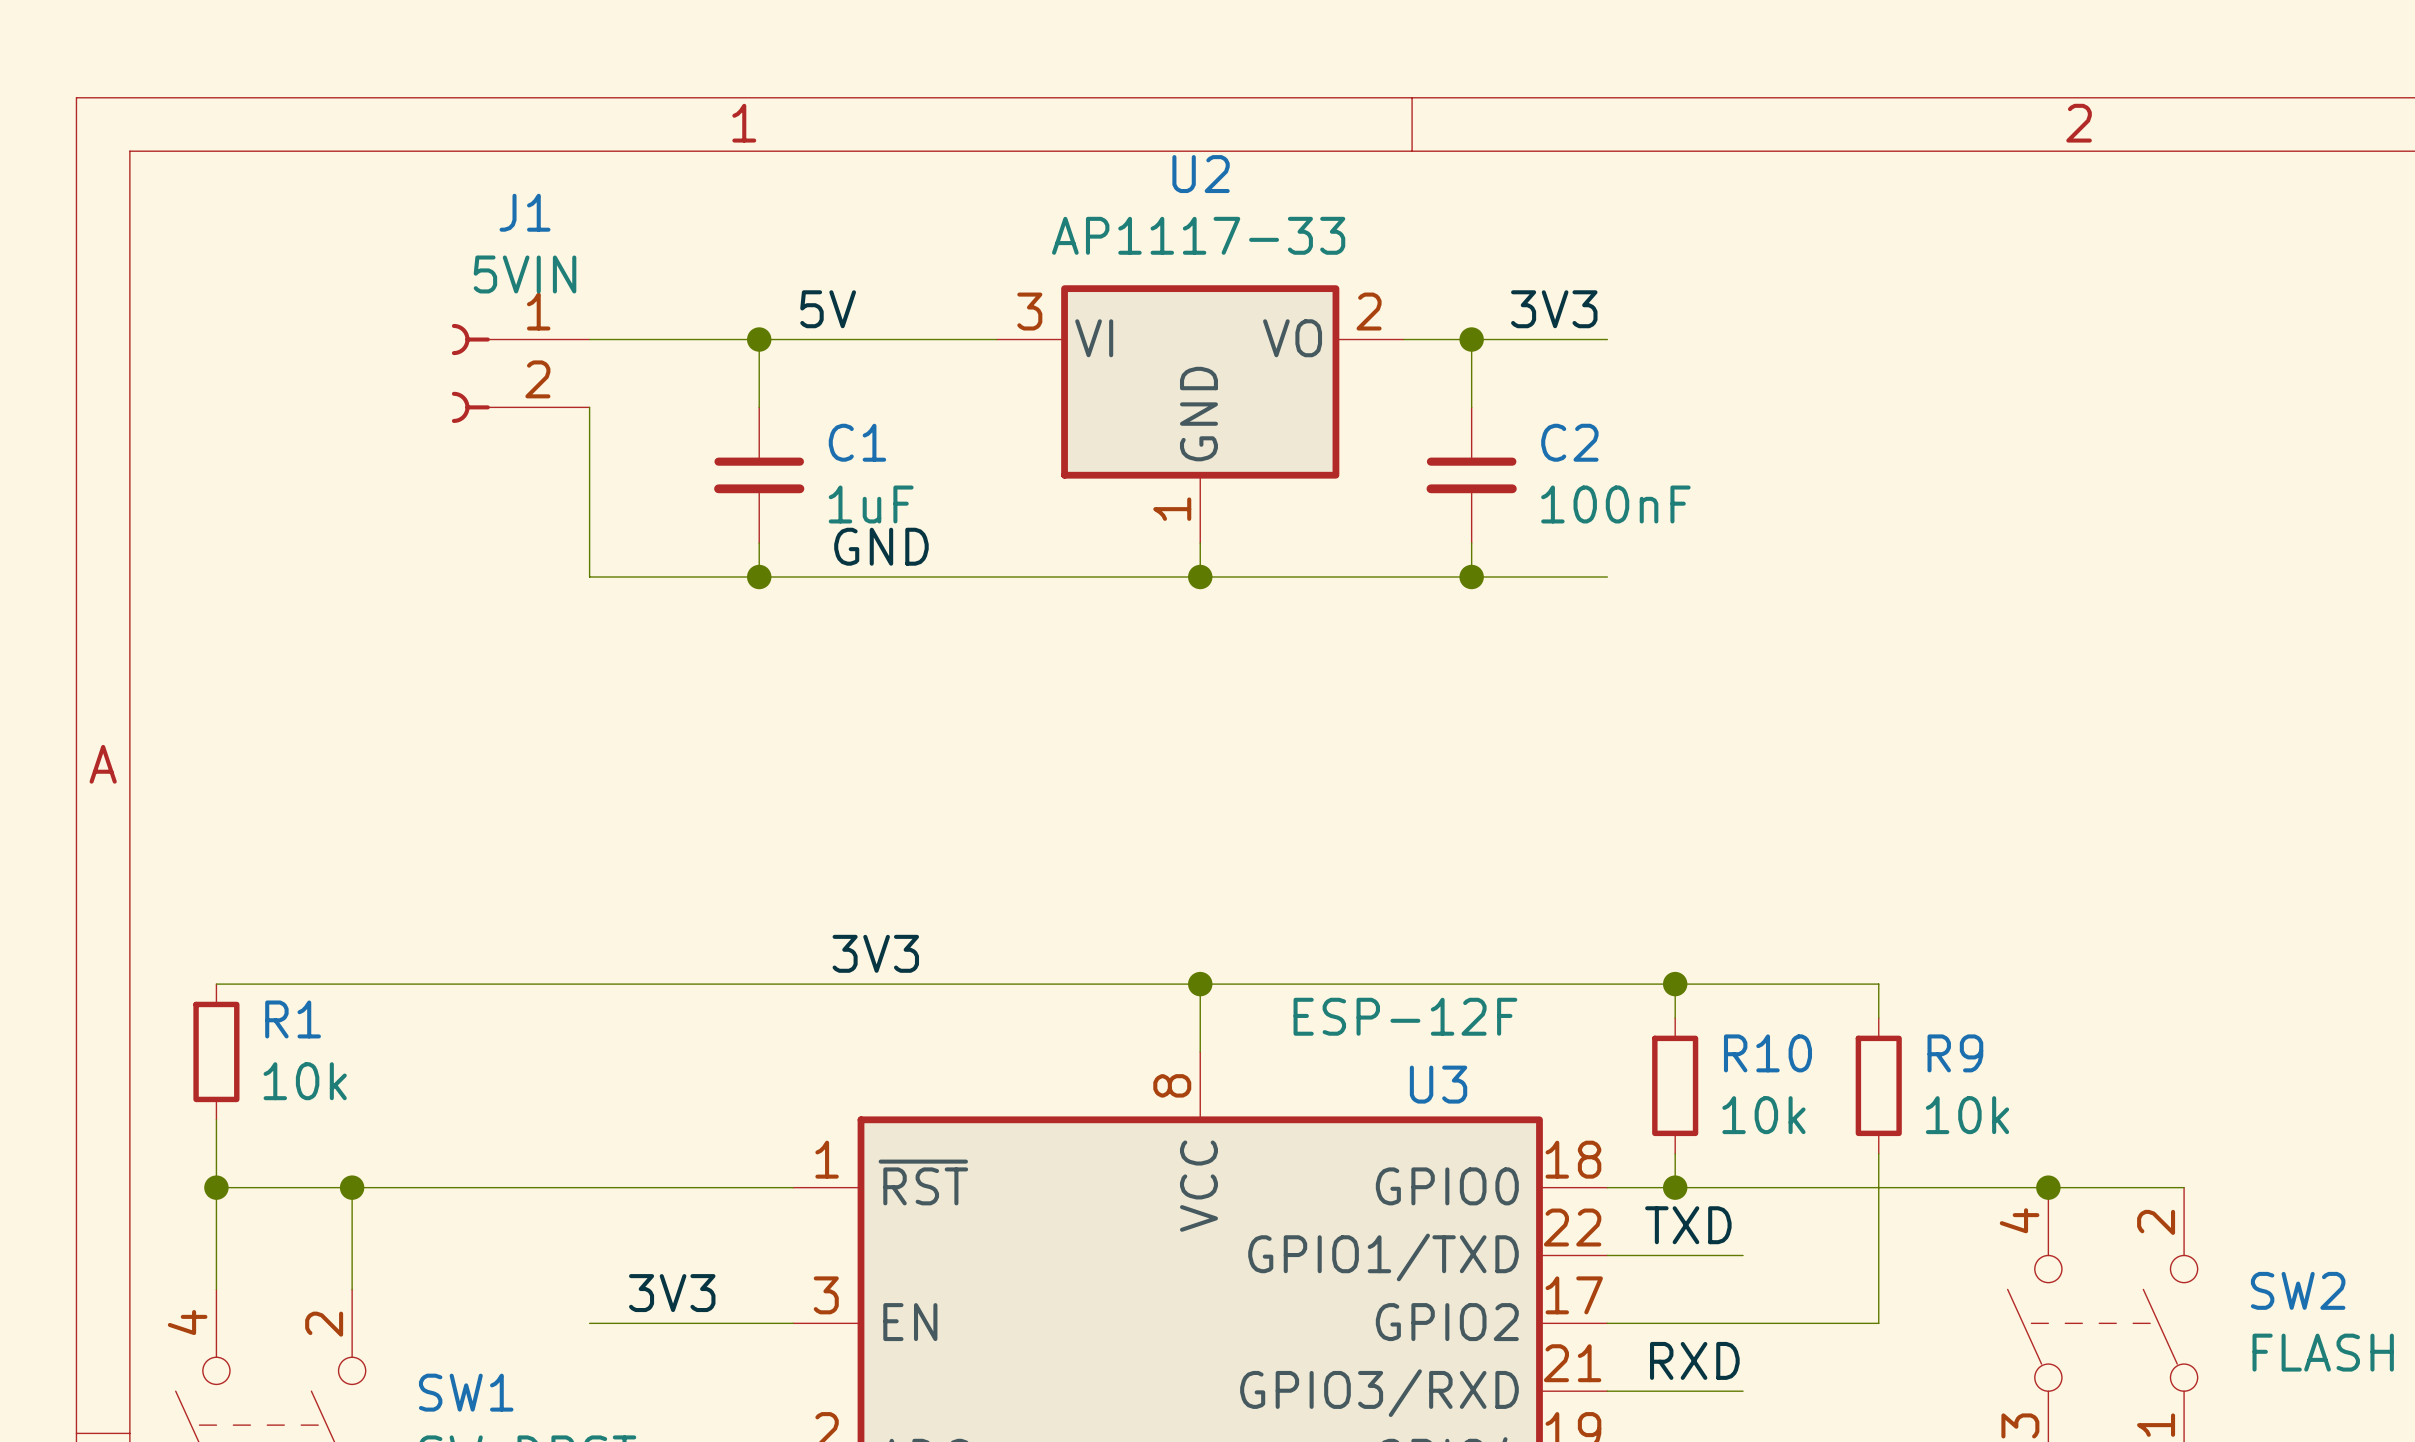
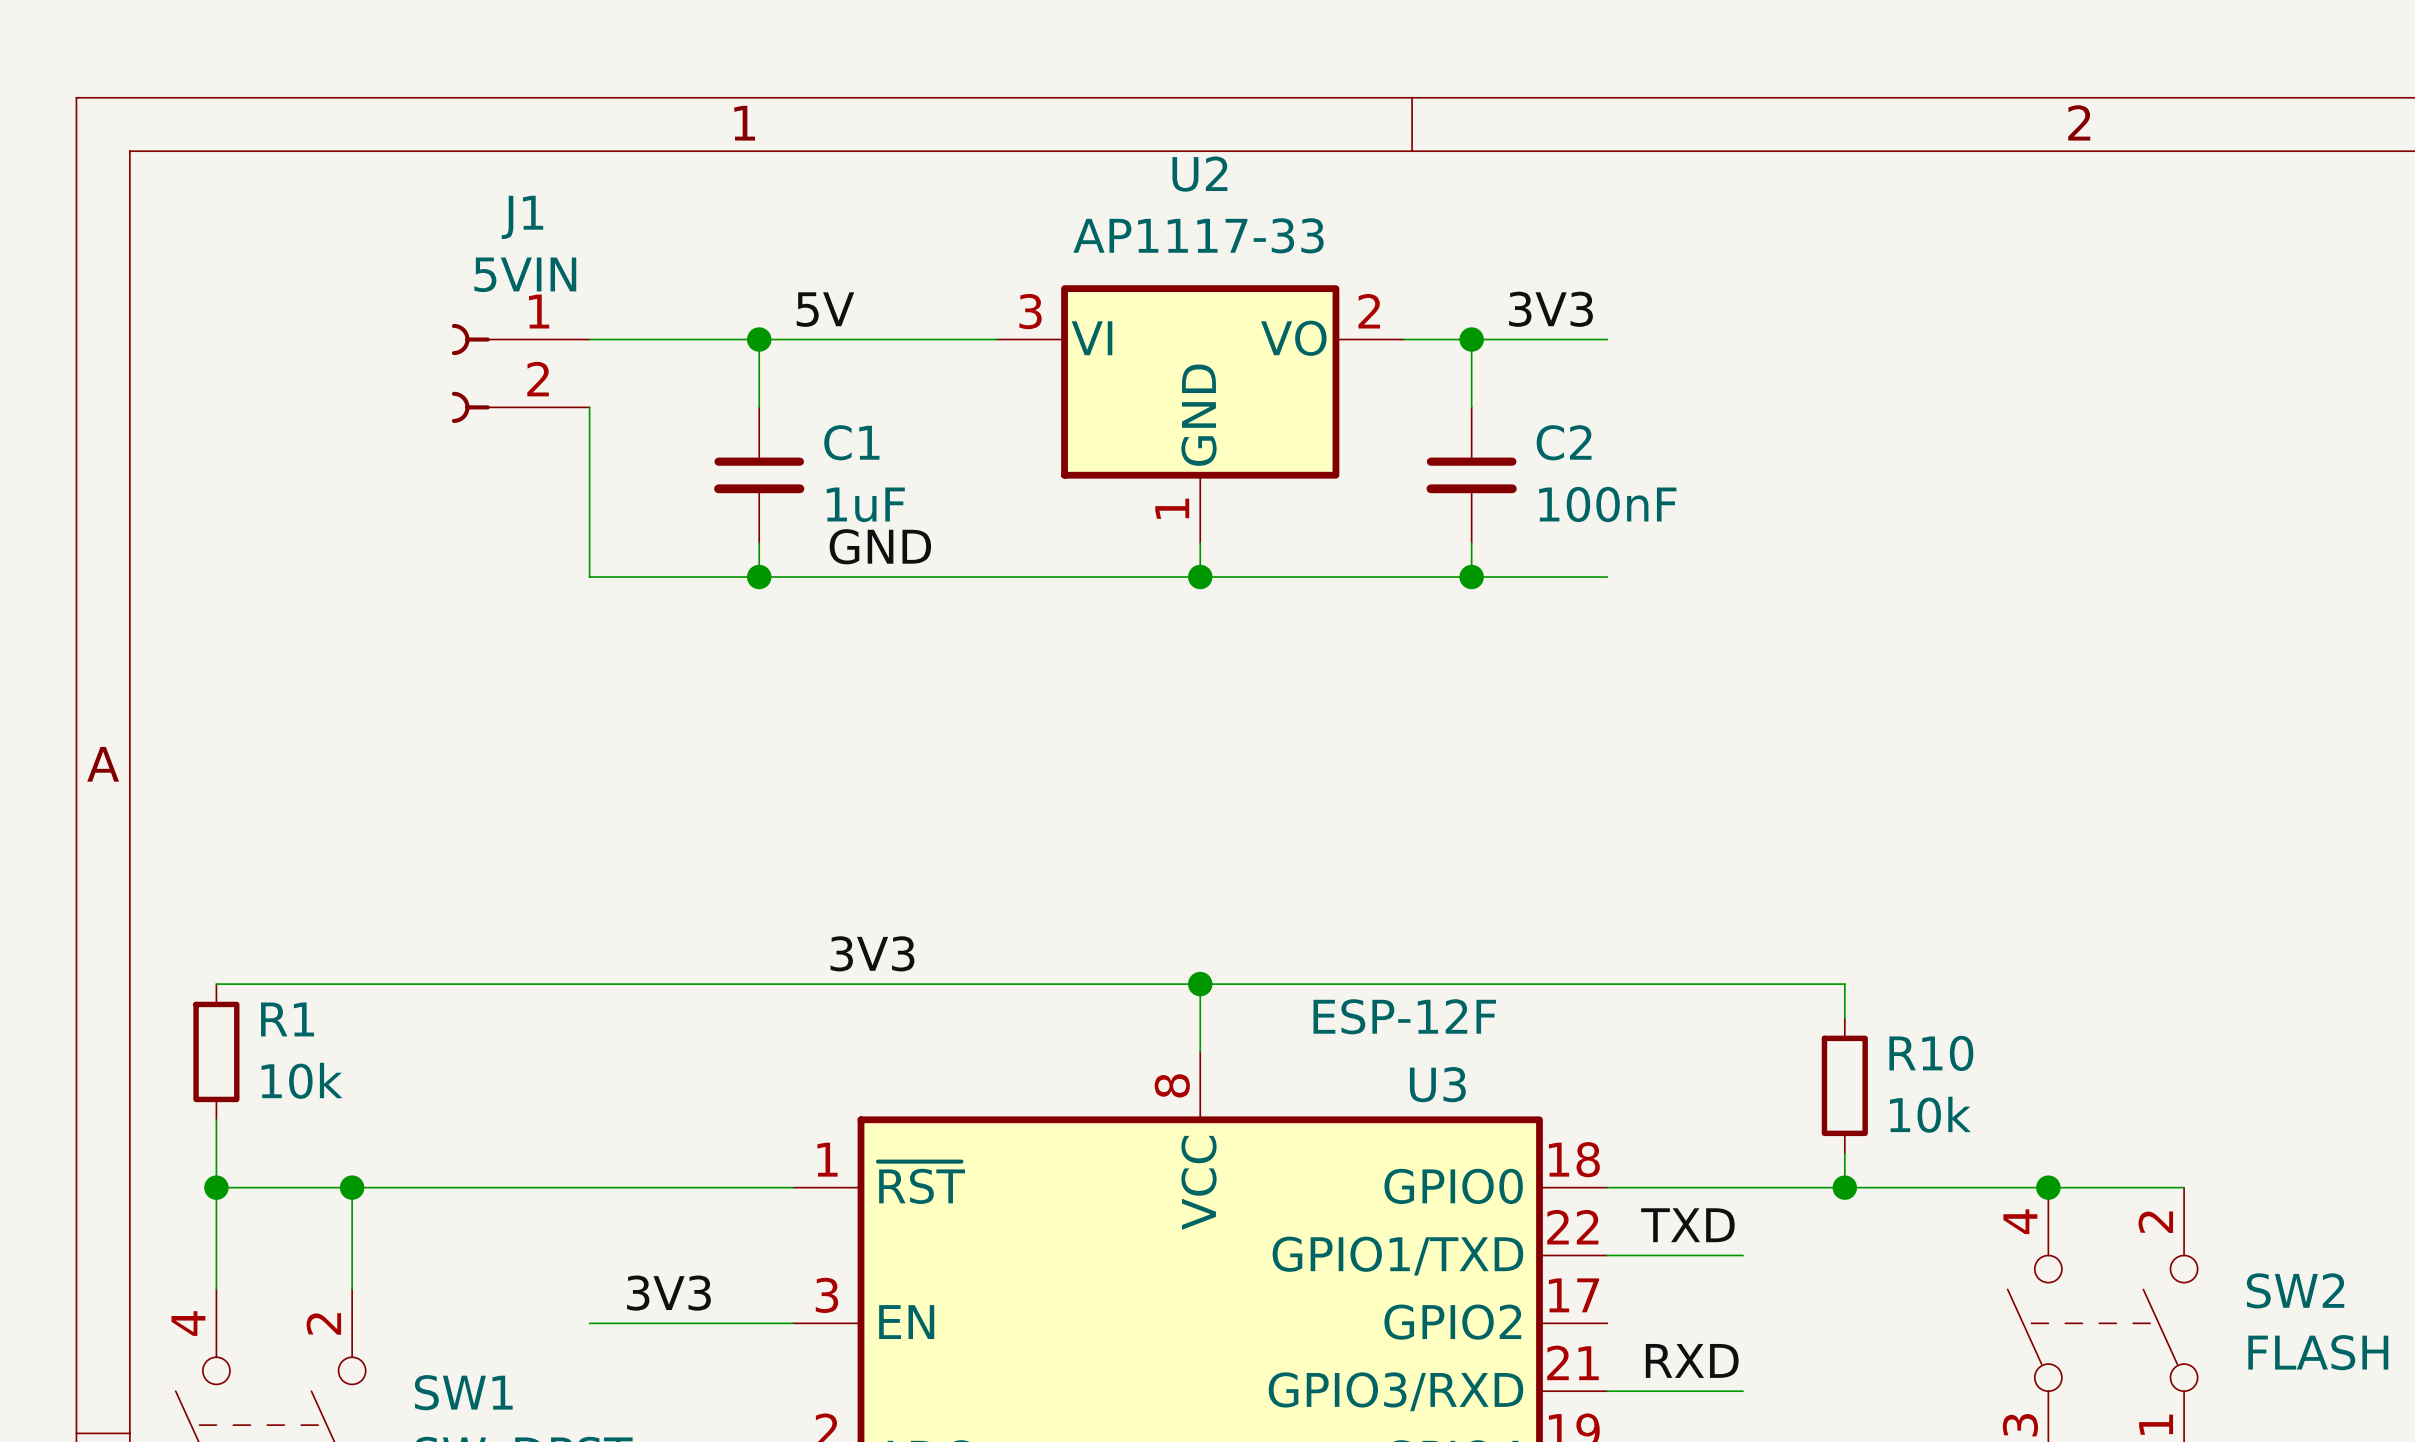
wire: (1675, 984) (1675, 1018) -> none
junction: (1675, 984) -> none
wire: (1844, 984) (1878, 984) (1878, 1018) -> (1844, 984) (1844, 1018)
R10 position: (1675, 1085) -> (1844, 1085)
R9: 10k (1878, 1085) -> none
wire: (1675, 1153) (1675, 1187) -> (1844, 1153) (1844, 1187)
wire: (1878, 1153) (1878, 1323) (1607, 1323) -> none
junction: (1675, 1187) -> none
junction: none -> (1844, 1187)

